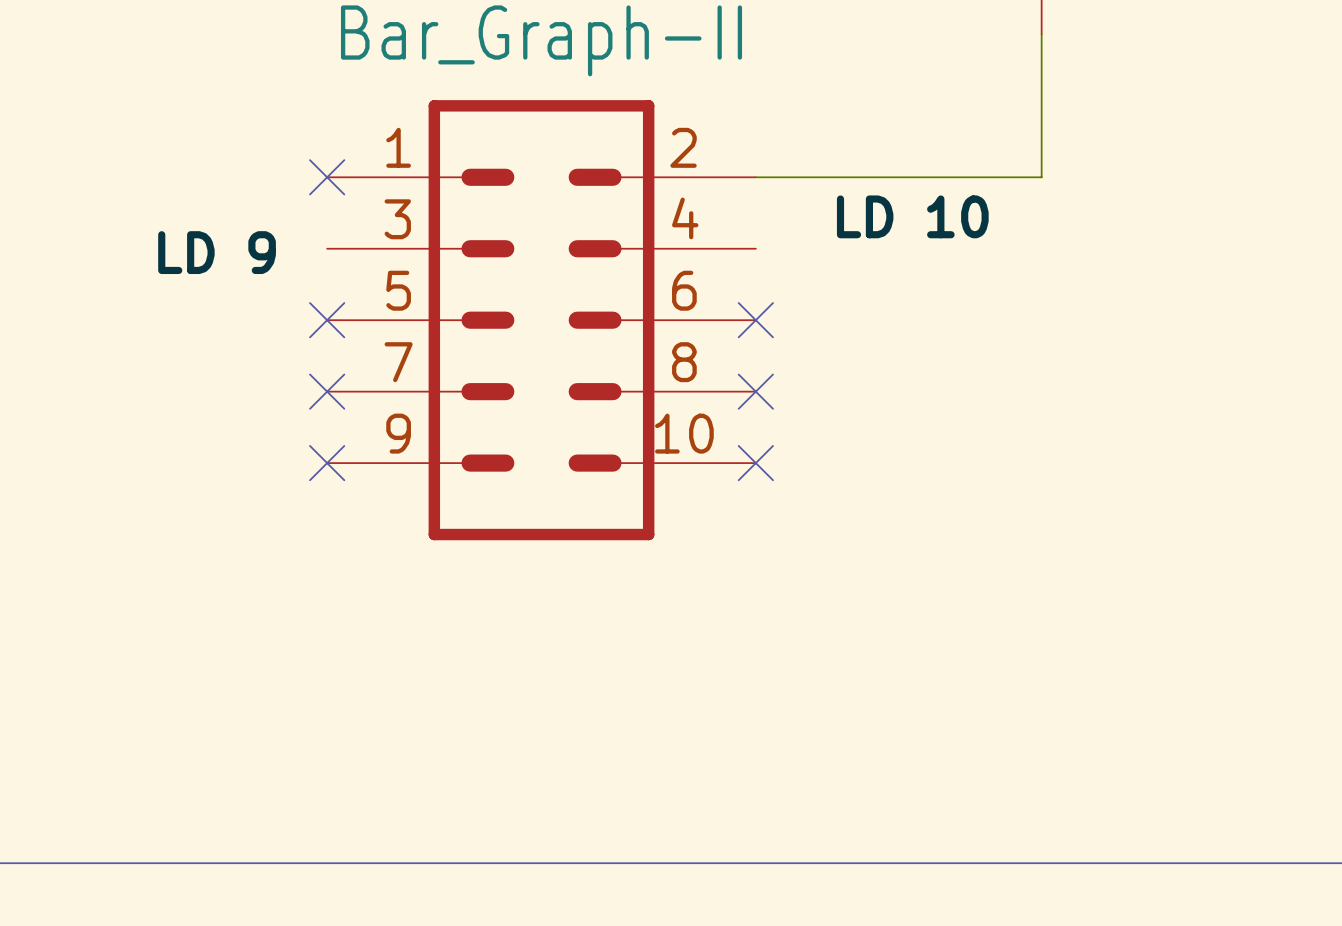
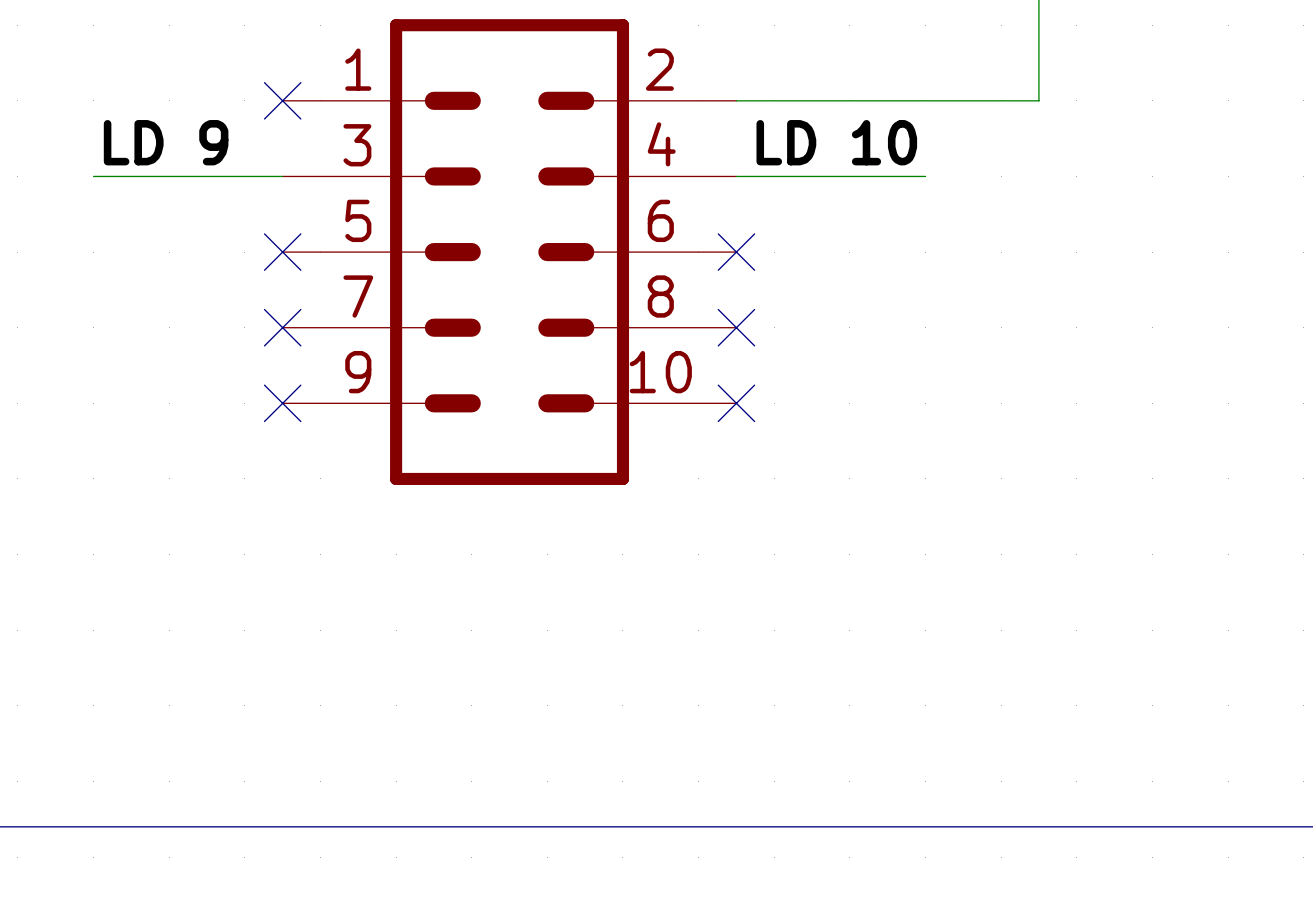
label position: LD 10 (912, 216) -> LD 10 (836, 142)
wire: none -> (93, 176) (282, 176)
wire: none -> (736, 176) (925, 176)
label position: LD 9 (217, 252) -> LD 9 (166, 142)

